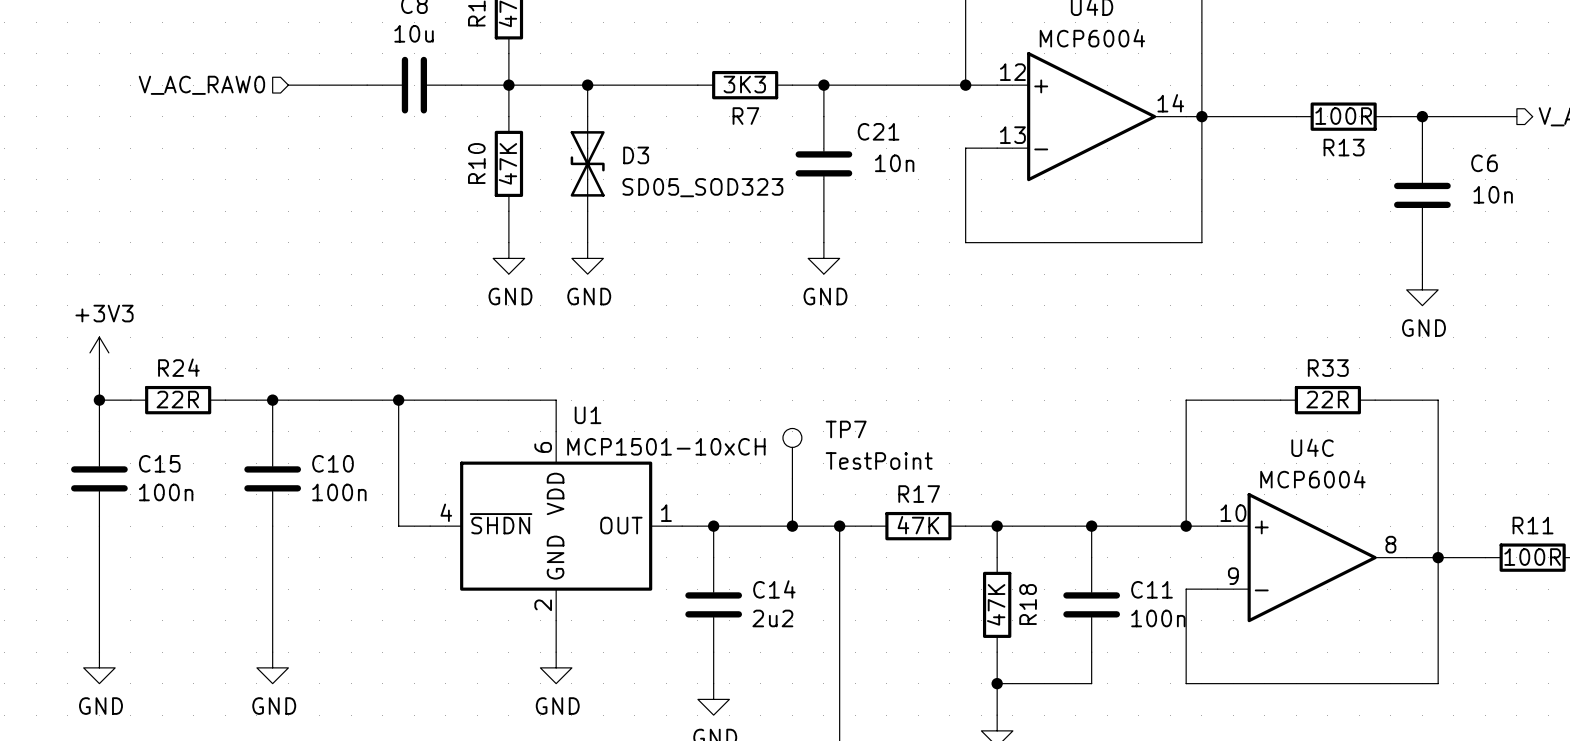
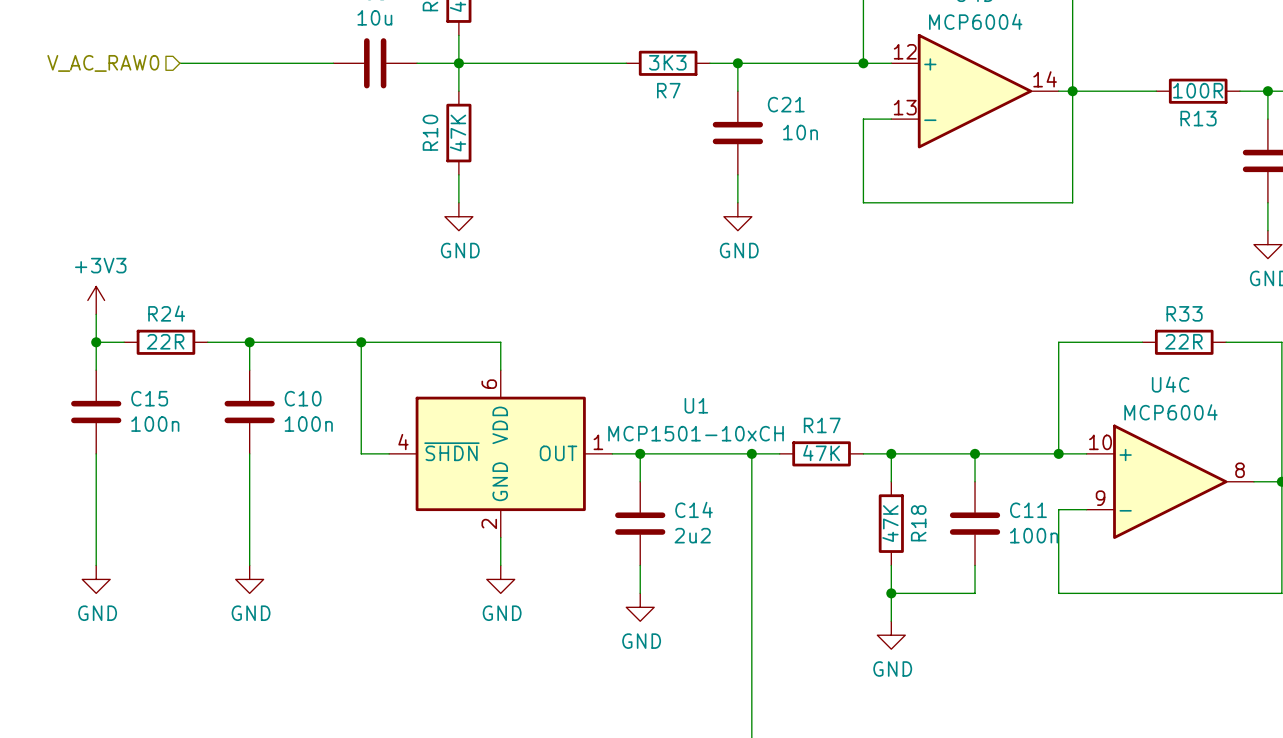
wire: none -> (179, 63) (263, 63)
hierarchical label position: V_AC_RAW0 (201, 85) -> V_AC_RAW0 (103, 63)
wire: (587, 85) (587, 116) -> none
junction: (587, 85) -> none
D3: SD05_SOD323 (587, 163) -> none
wire: (587, 211) (587, 242) -> none
power symbol: GND (587, 258) -> none
U1 name position: U1 (588, 415) -> U1 (696, 405)
U1 value position: MCP1501-10xCH (666, 446) -> MCP1501-10xCH (696, 433)
TP7: TestPoint (792, 453) -> none
wire: (792, 478) (792, 526) -> none
junction: (792, 526) -> none

